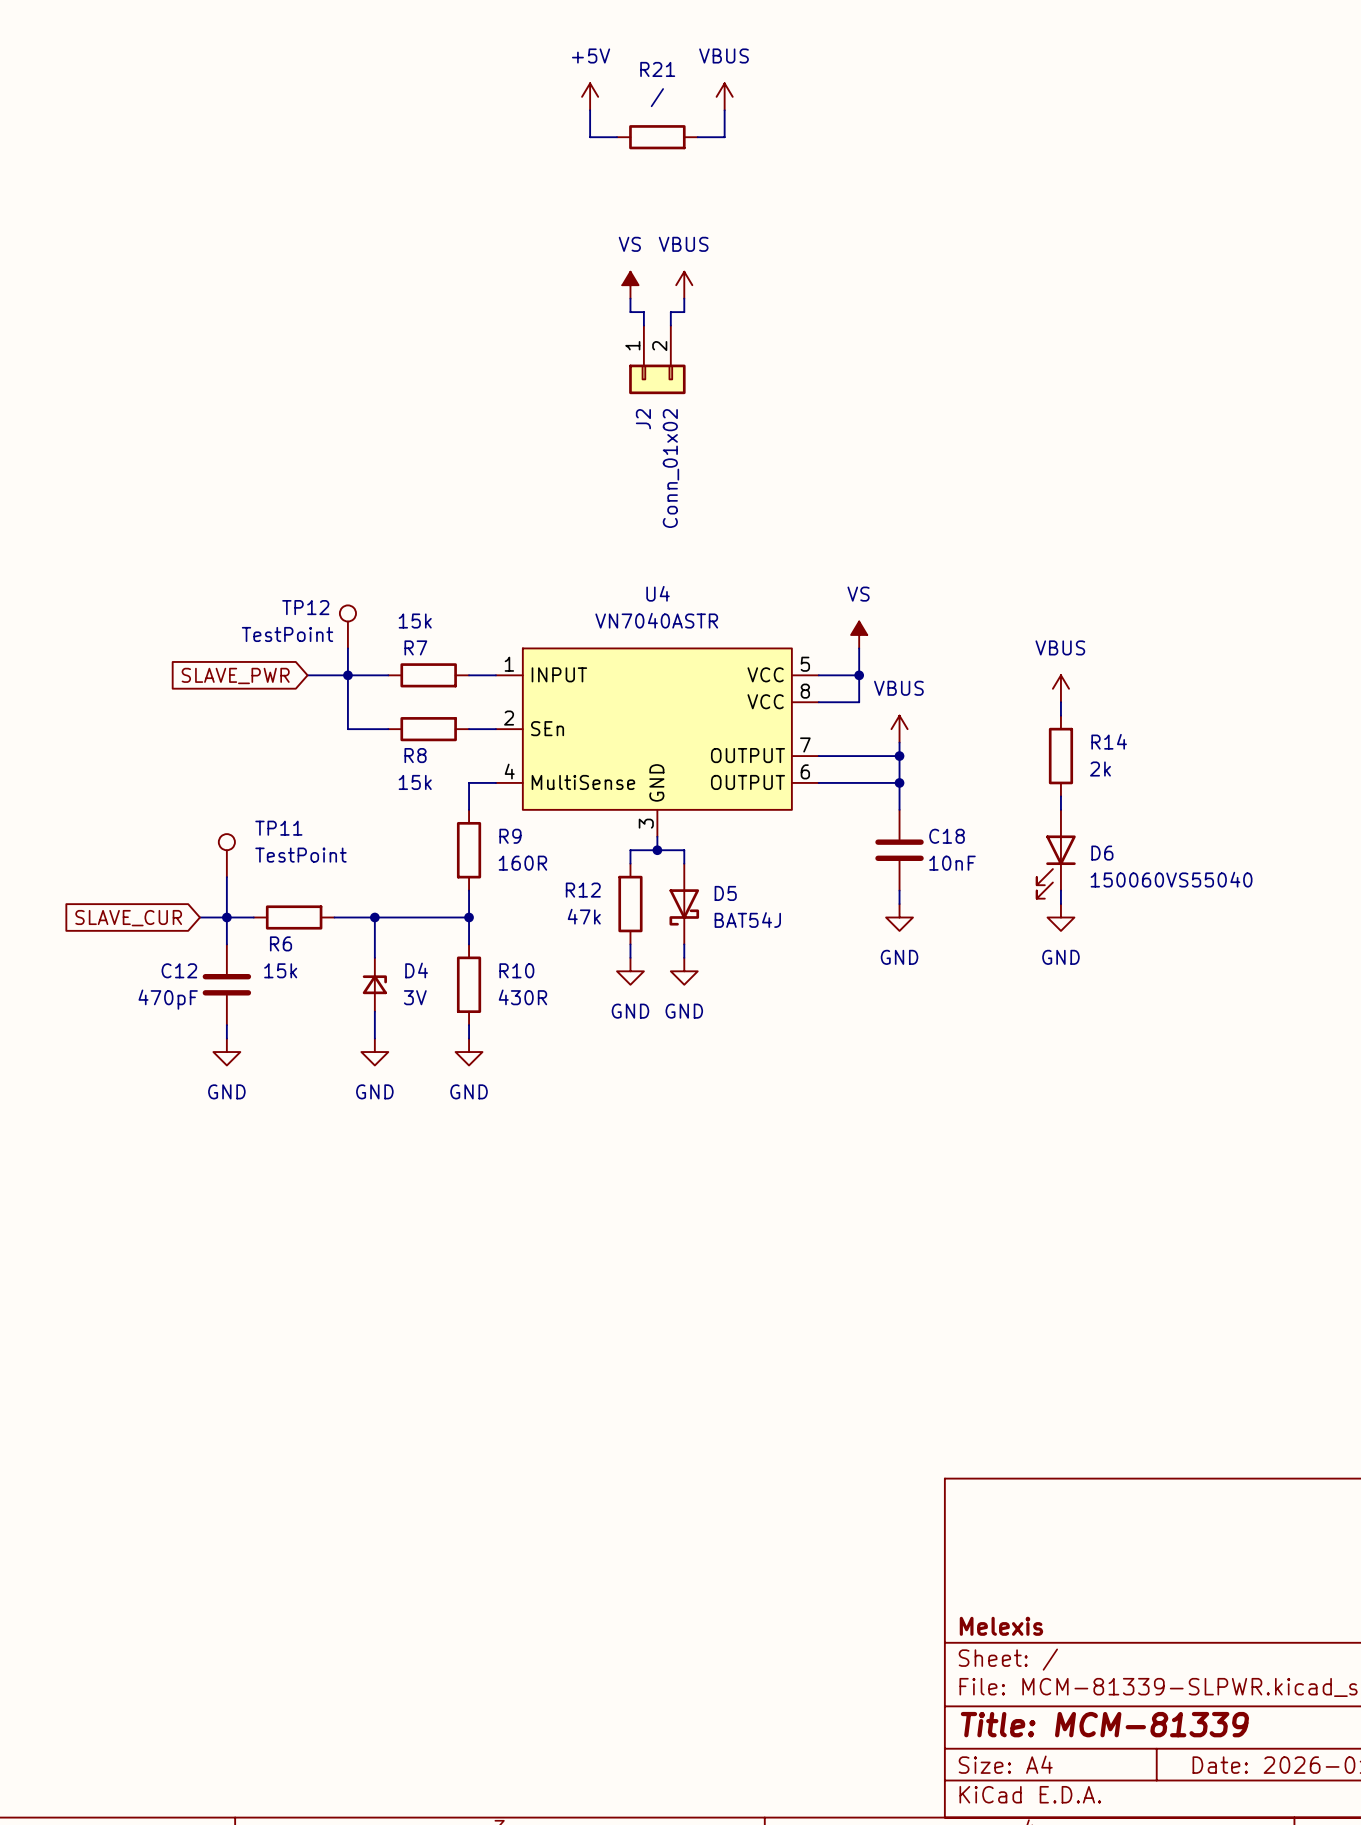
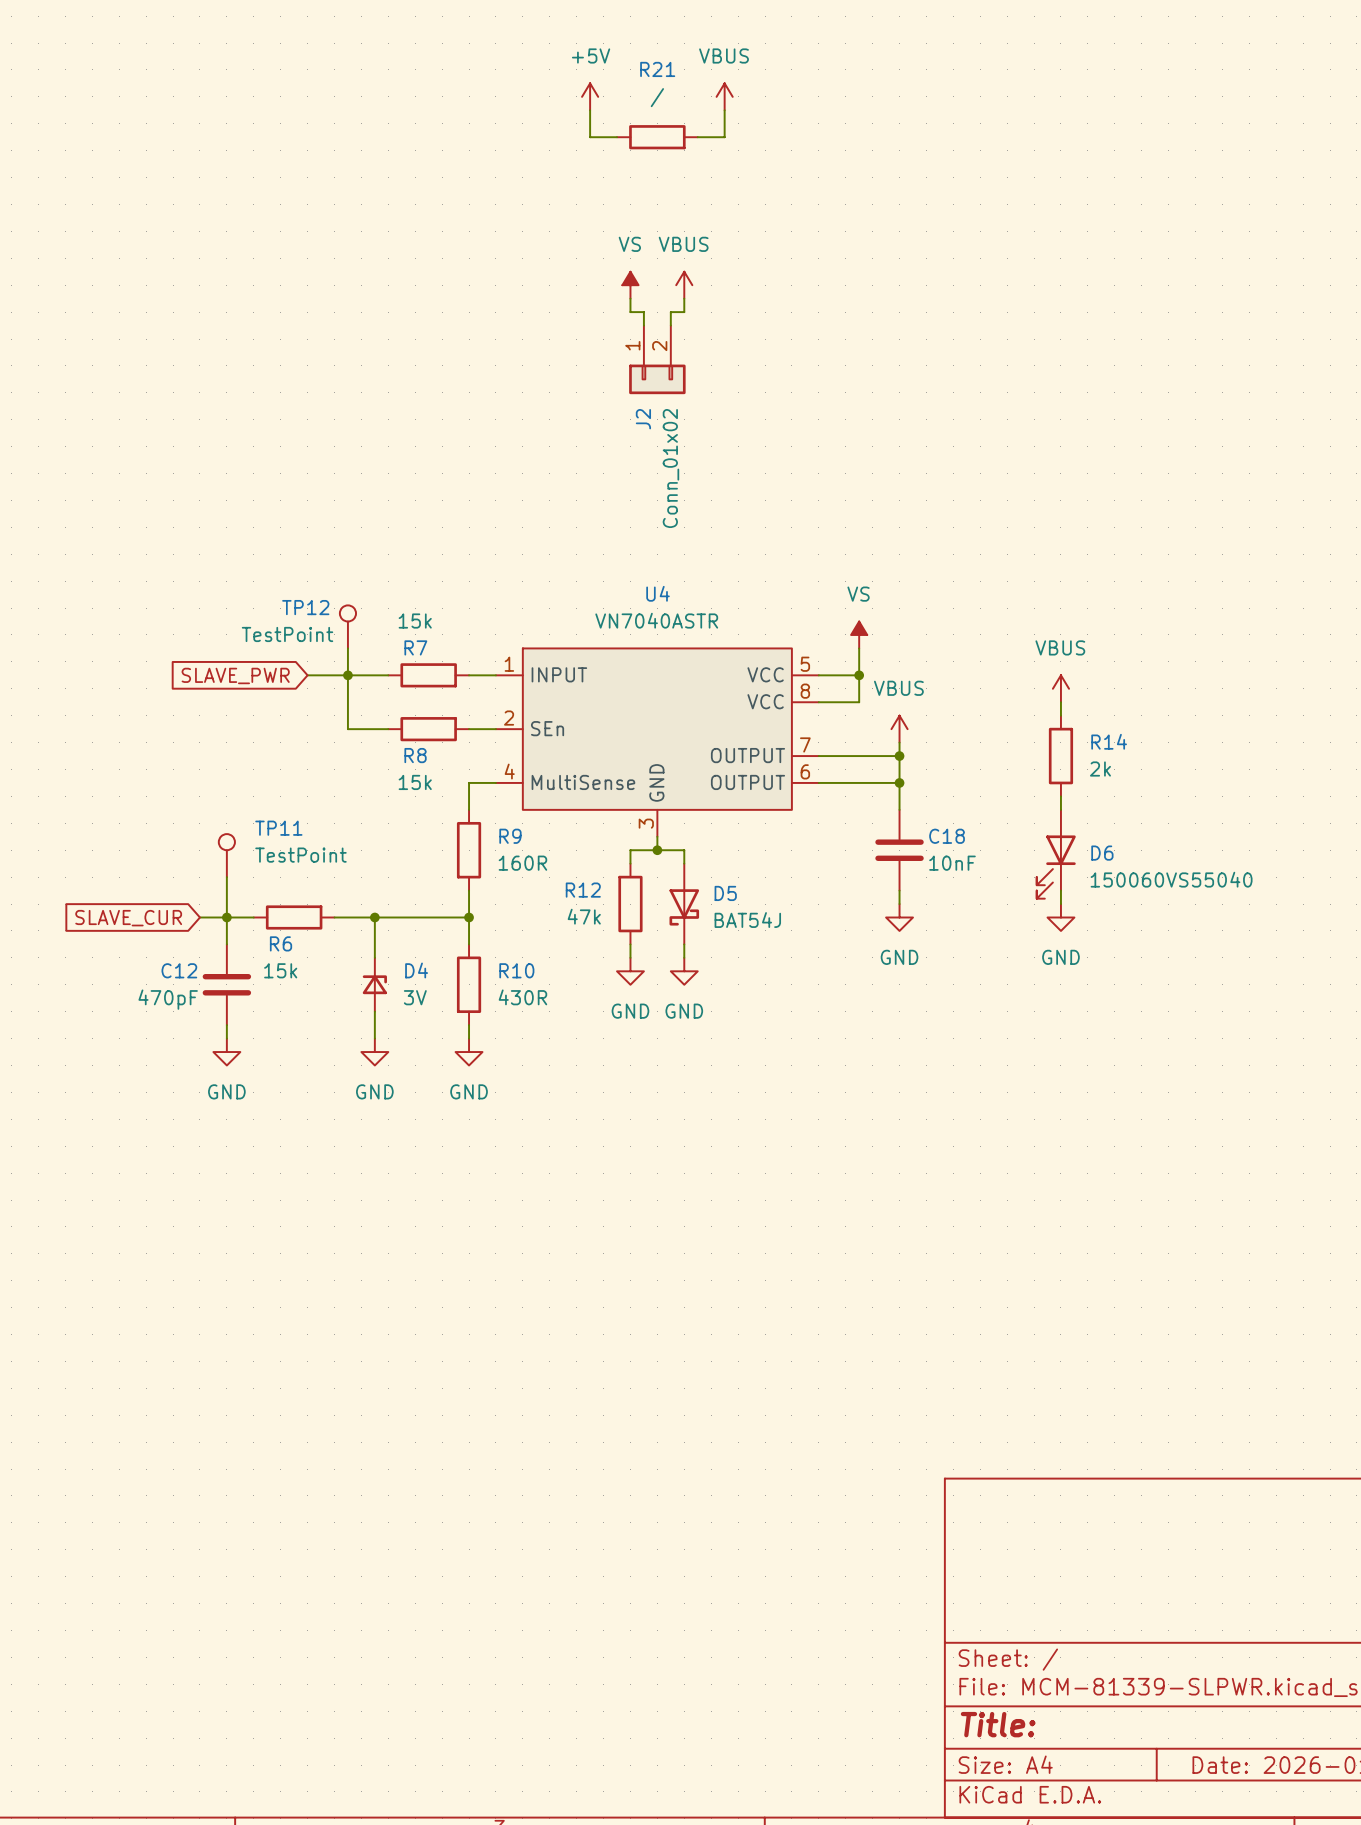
title block: Melexis (1001, 1626) -> none
title block: Title: MCM-81339 (1104, 1724) -> Title: (998, 1724)

